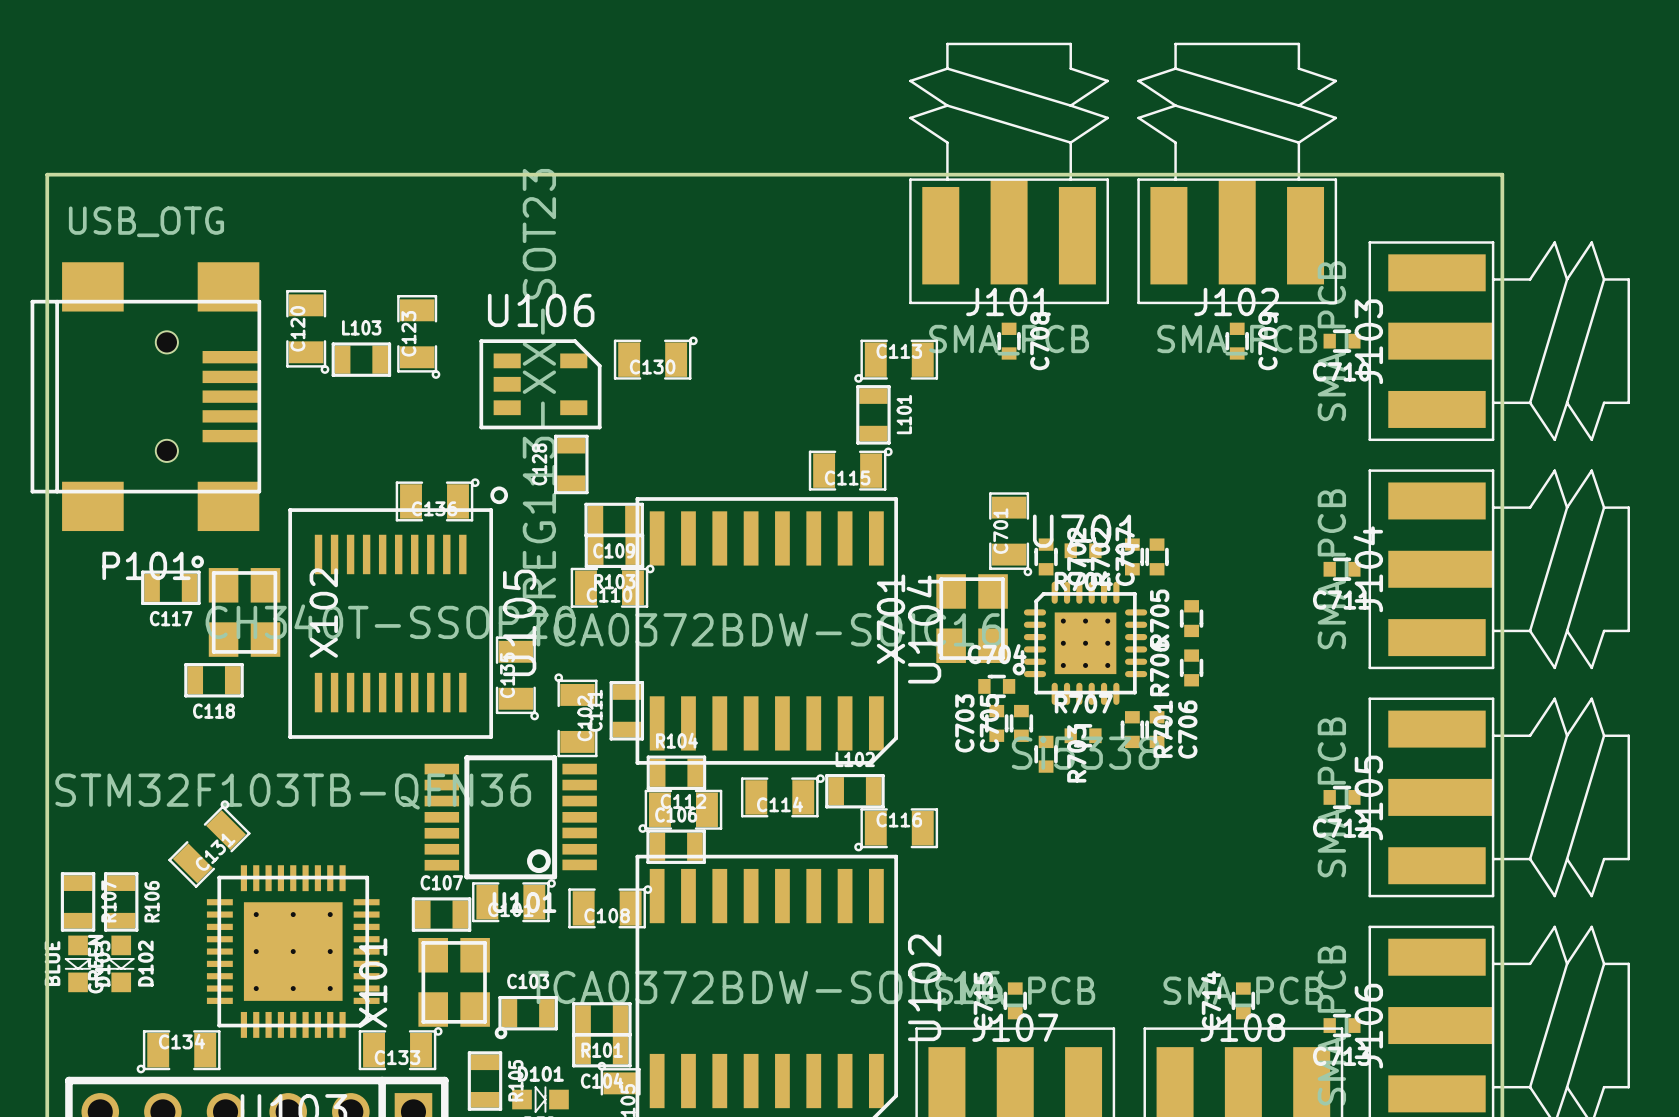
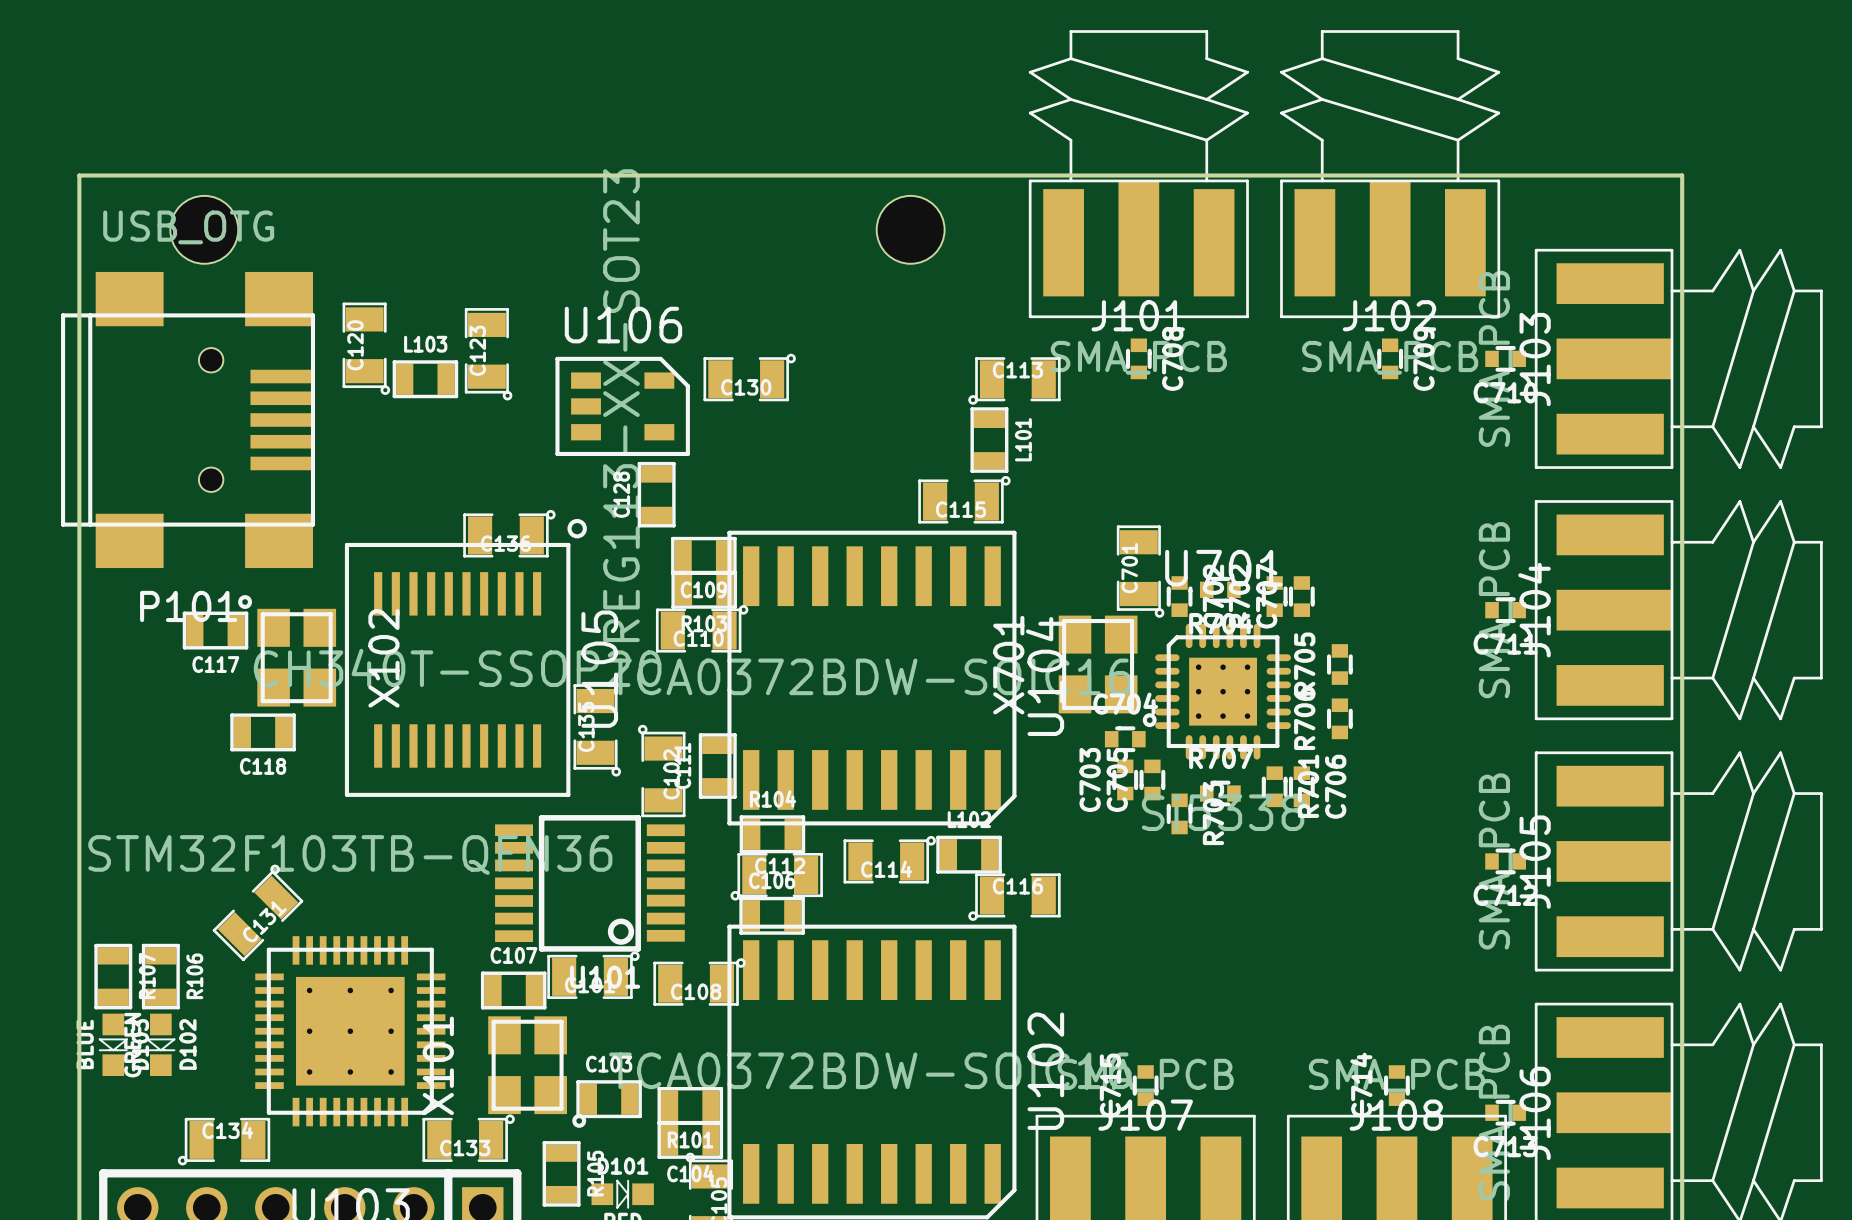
part: none -> (204, 229)
part: none -> (910, 229)

